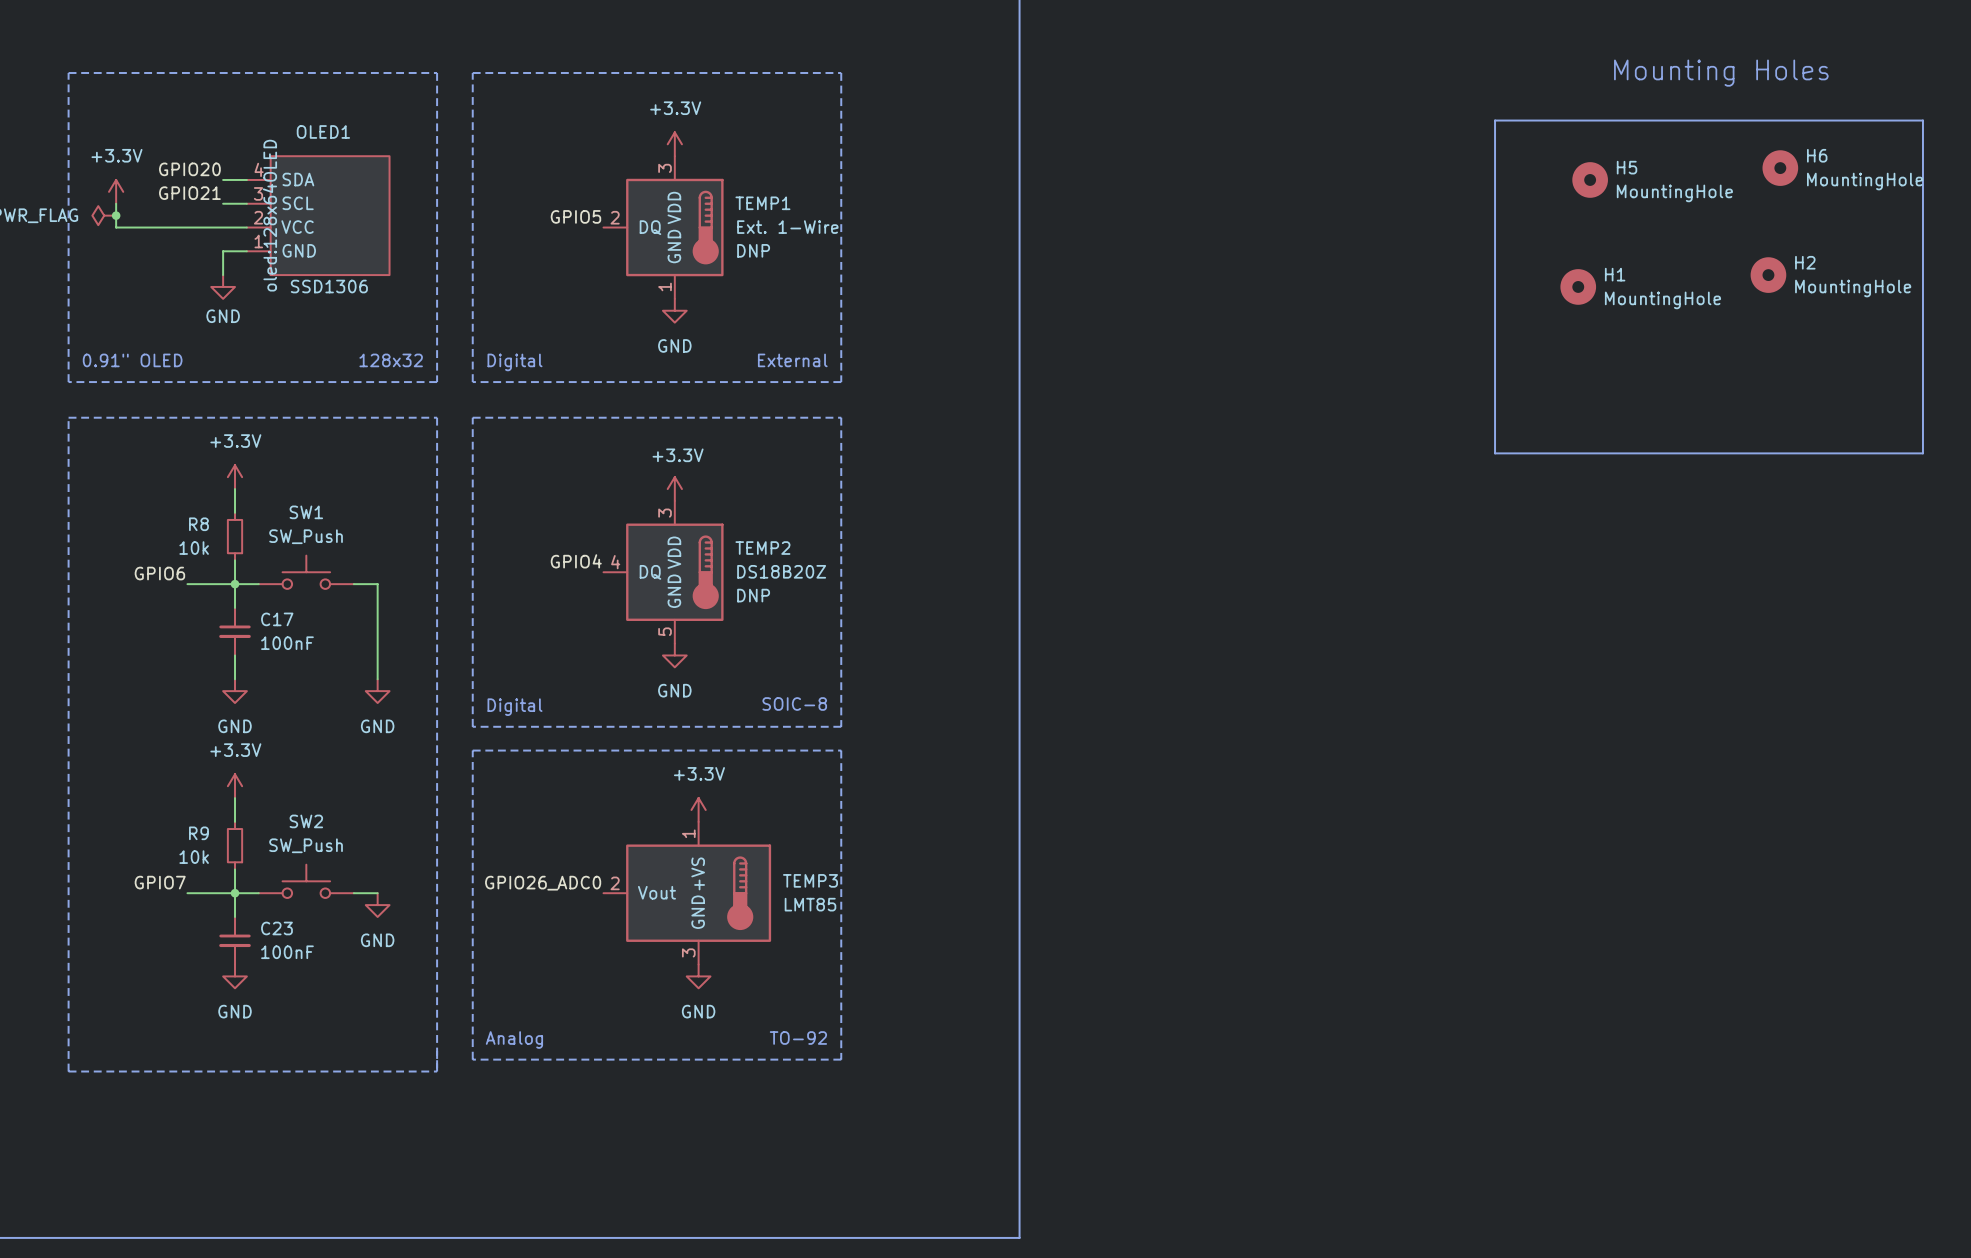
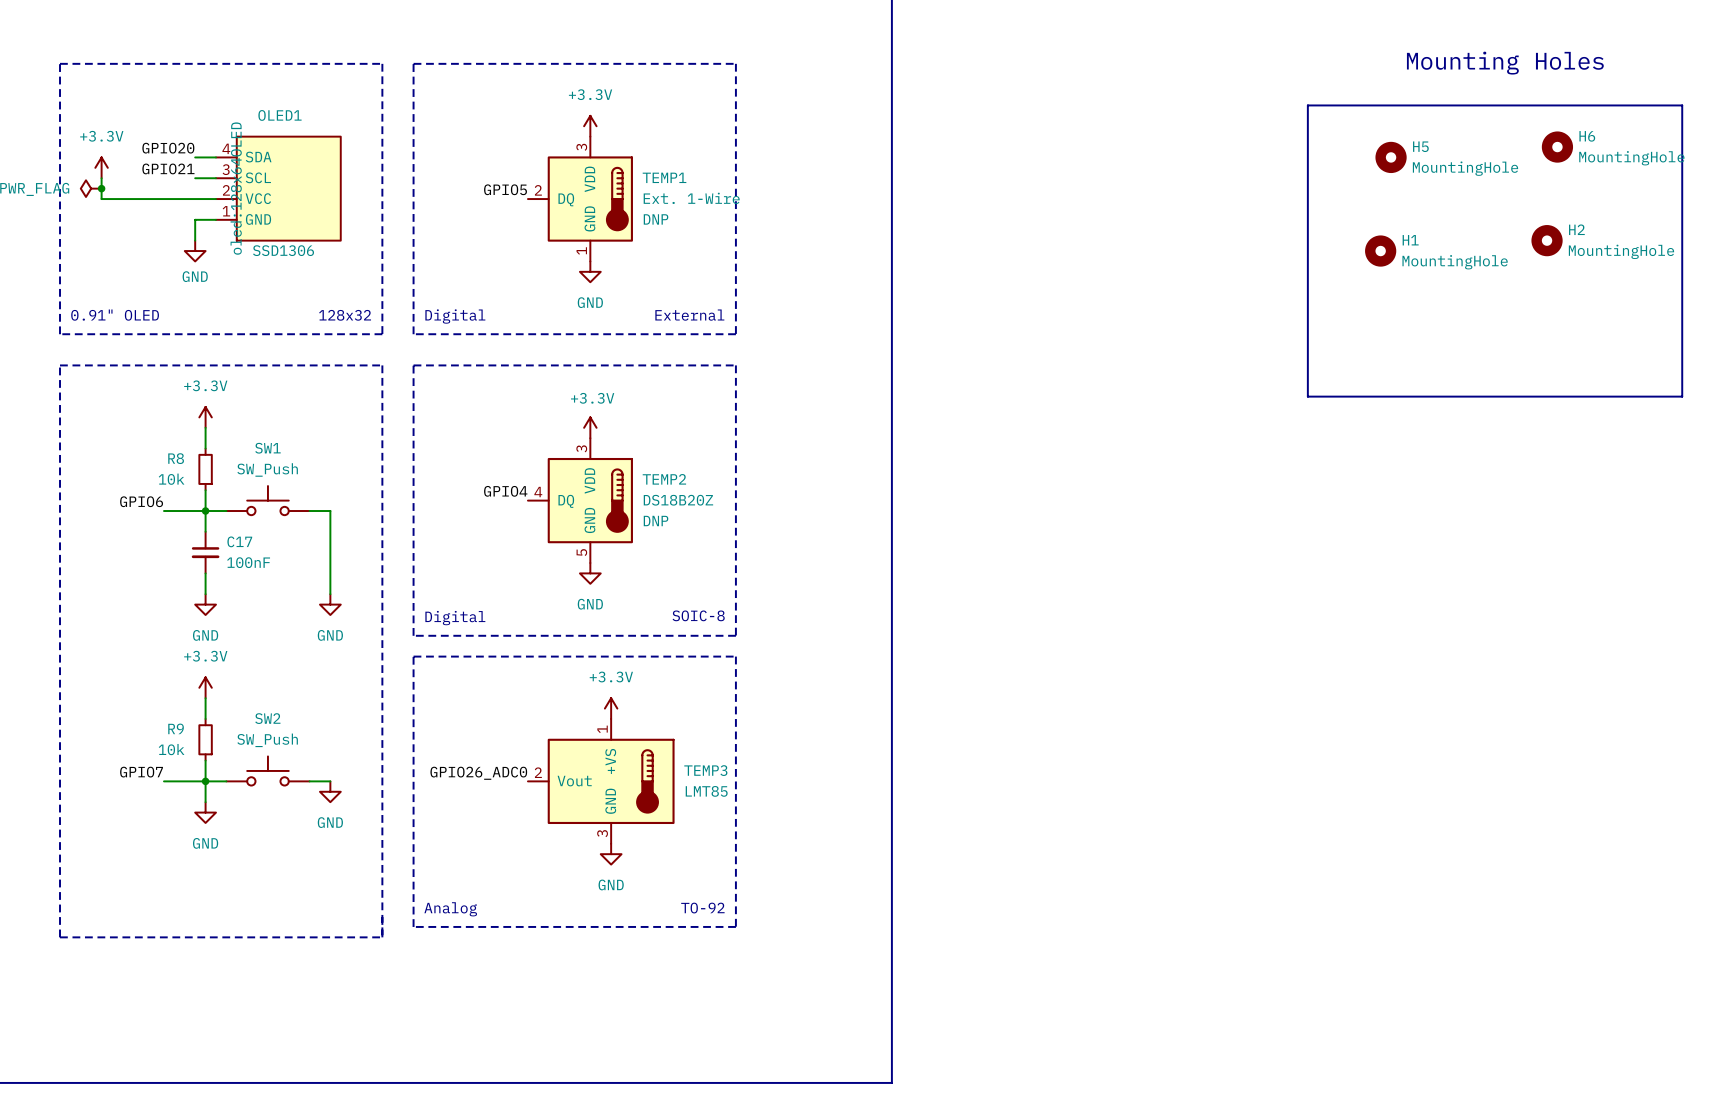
C23: 100nF (235, 940) -> none
power symbol position: GND (235, 976) -> GND (205, 812)

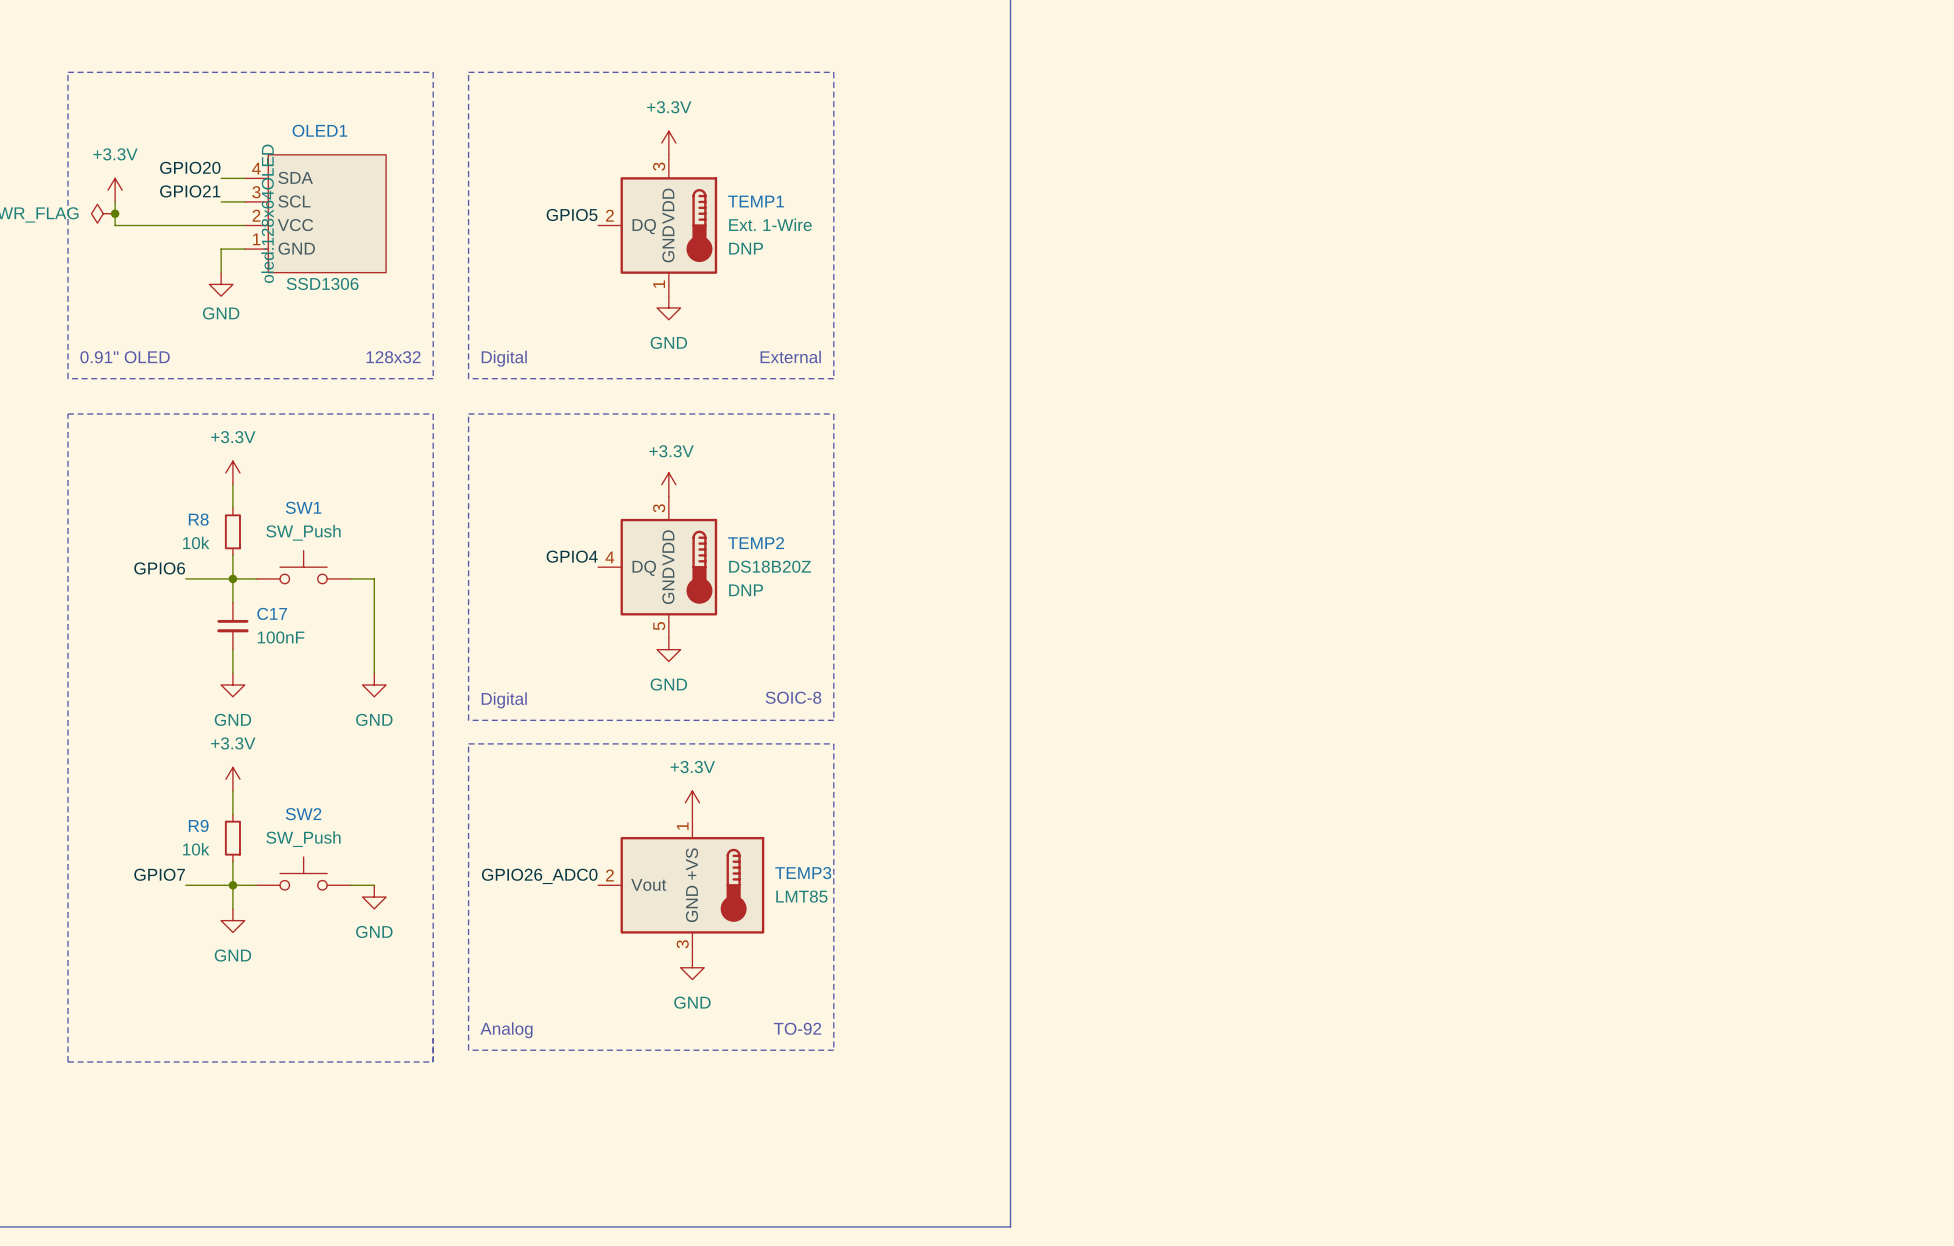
text: Mounting Holes (1505, 63) -> none
line: (1307, 105) (1682, 105) (1682, 396) (1307, 396) (1307, 105) -> none
H6: MountingHole (1557, 147) -> none
H5: MountingHole (1391, 157) -> none
H2: MountingHole (1547, 240) -> none
H1: MountingHole (1380, 251) -> none

